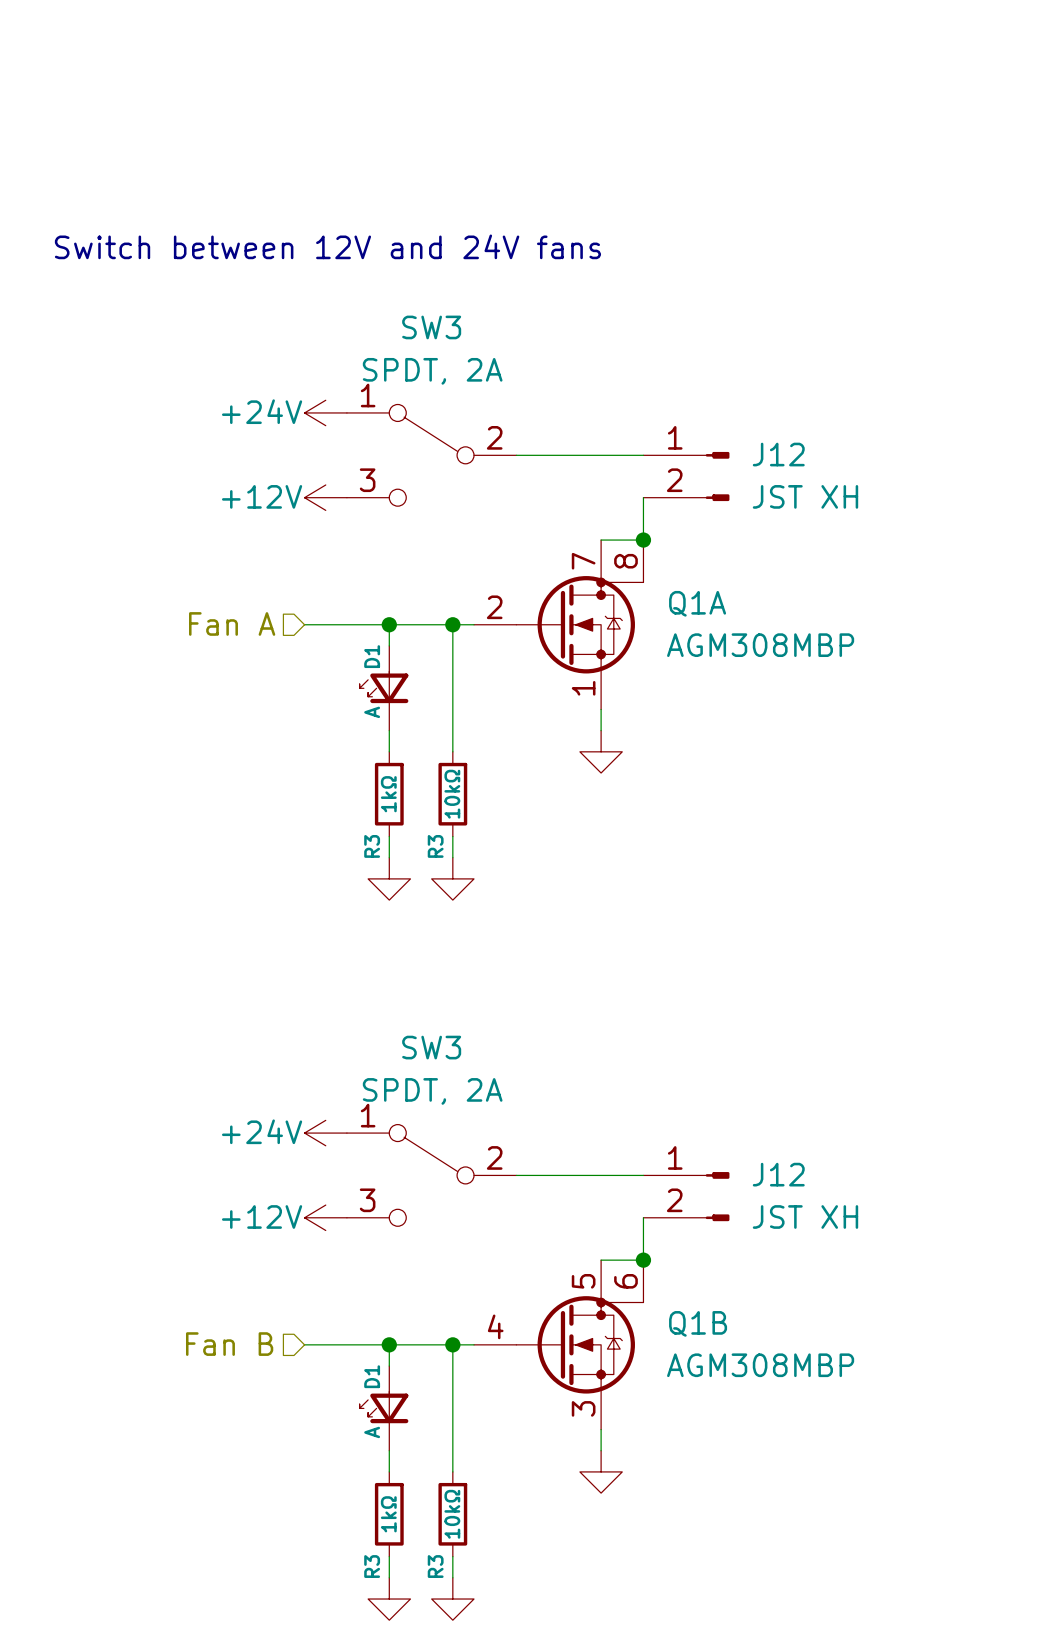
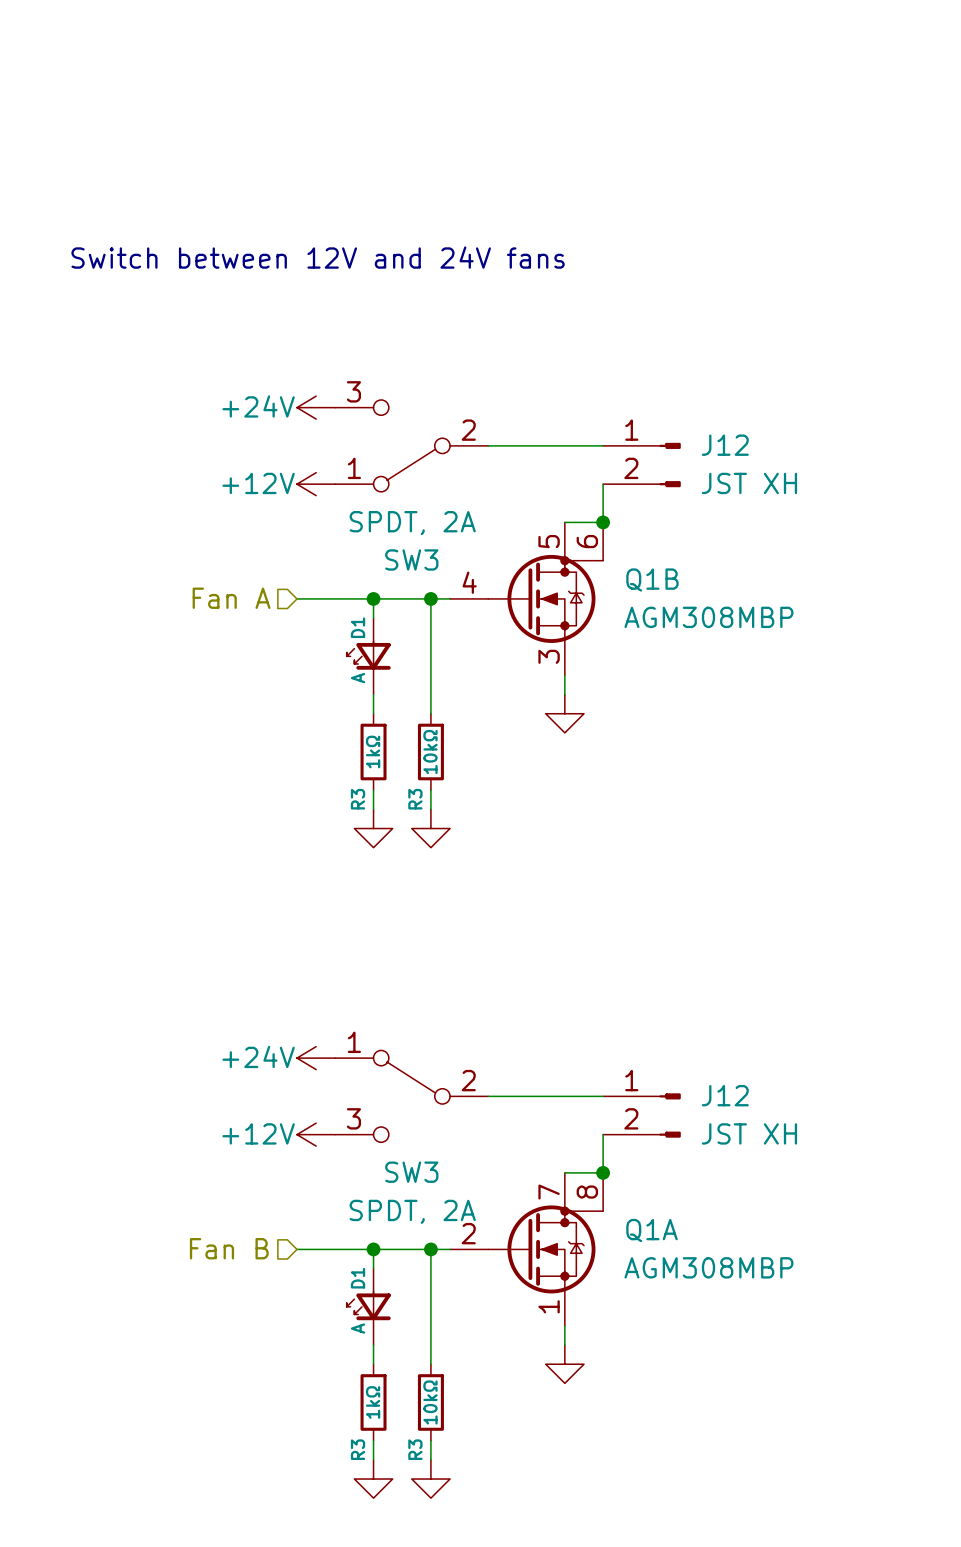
SW3 flip: as is (431, 455) -> up-down (411, 445)
Q1A position: (558, 624) -> (526, 1249)
SW3 name position: SW3 (431, 1047) -> SW3 (411, 1172)
SW3 value position: SPDT, 2A (432, 1091) -> SPDT, 2A (412, 1211)
Q1B position: (558, 1344) -> (526, 598)

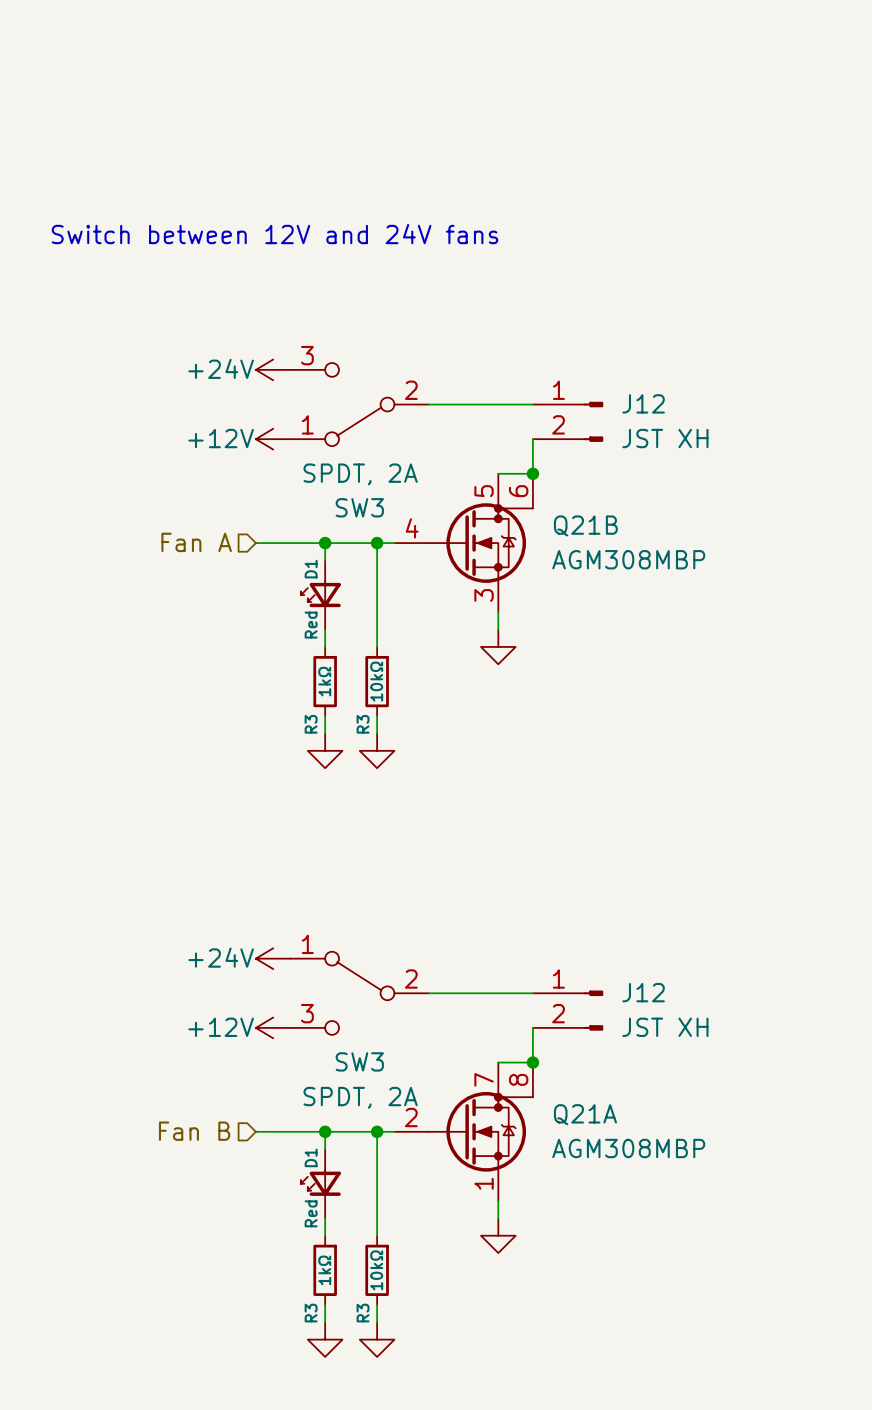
Q1B name: Q1B (652, 580) -> Q21B (585, 525)
D1 value: A (358, 678) -> Red (311, 625)
Q1A name: Q1A (652, 1230) -> Q21A (585, 1114)
D1 value: A (358, 1328) -> Red (311, 1213)

